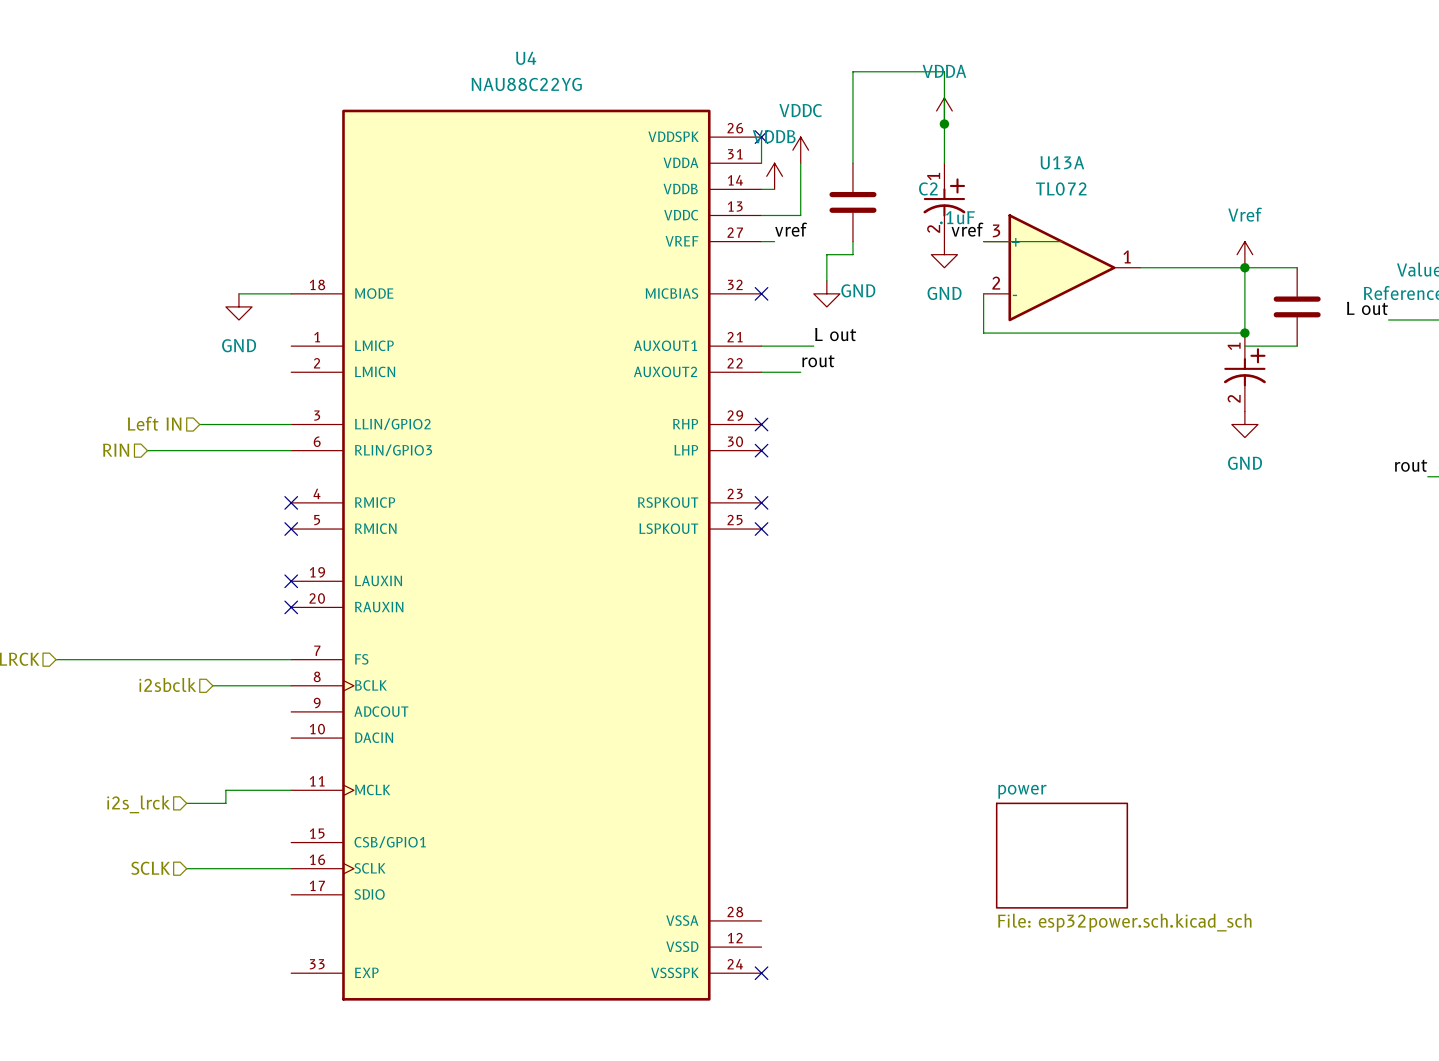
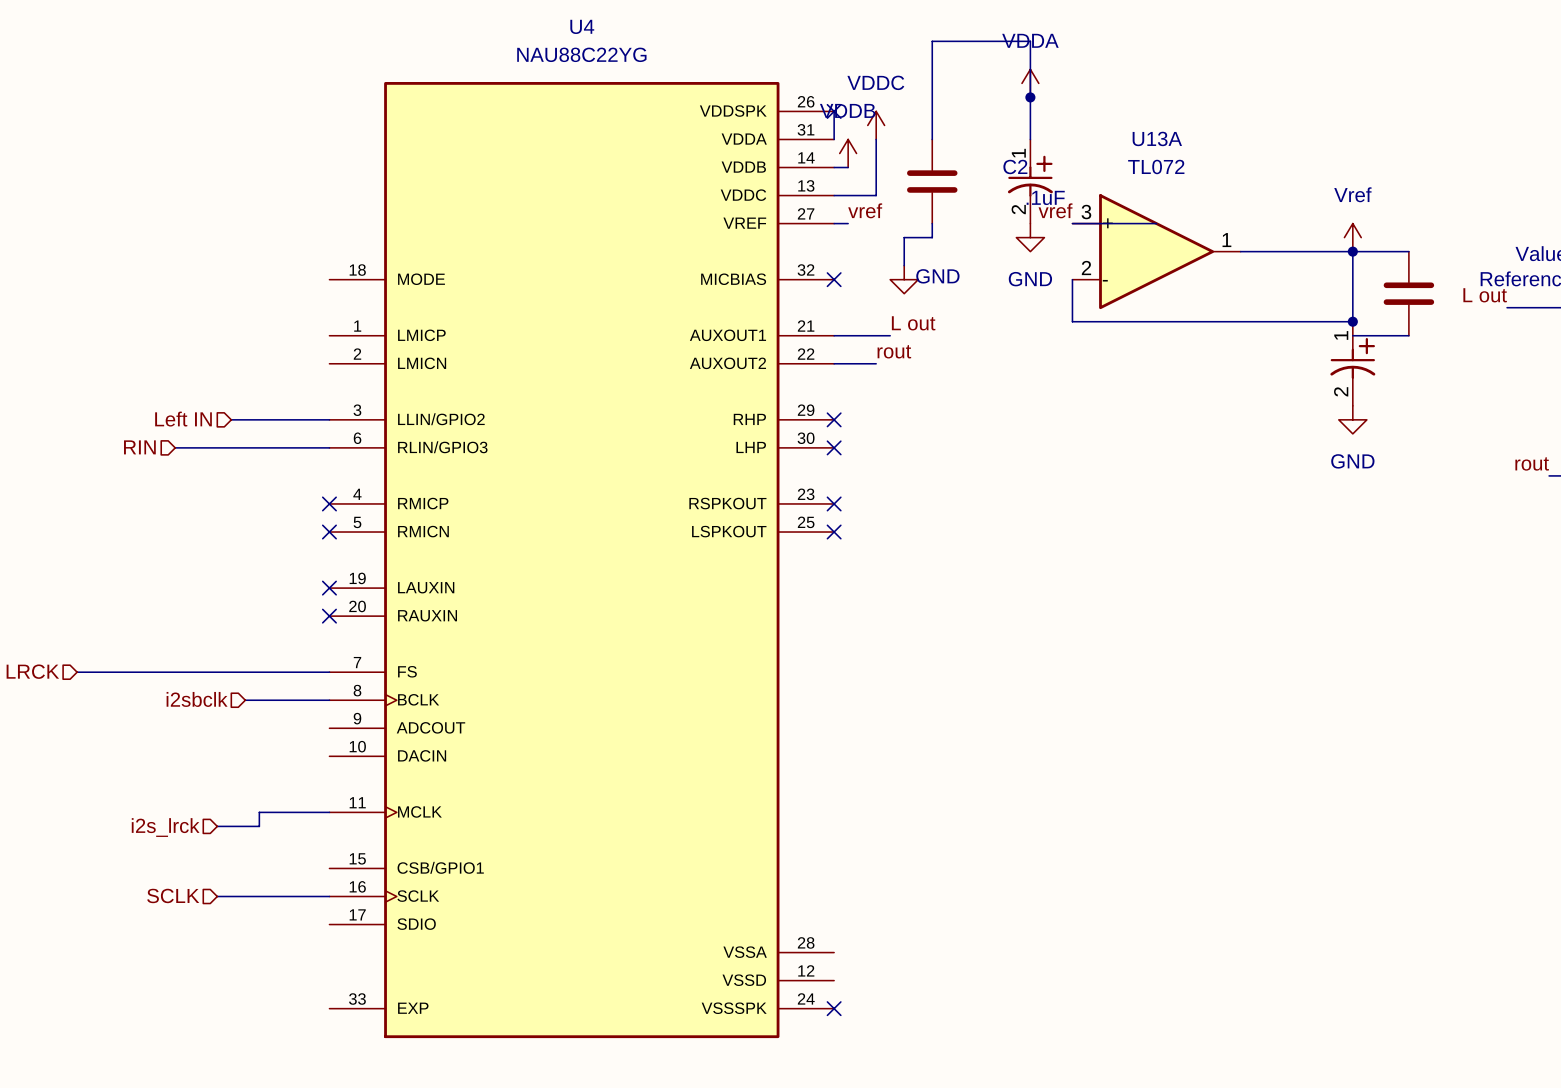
wire: (238, 293) (291, 293) -> none
power symbol: GND (238, 306) -> none
sheet power: File: esp32power.sch.kicad_sch (1062, 855) -> none

